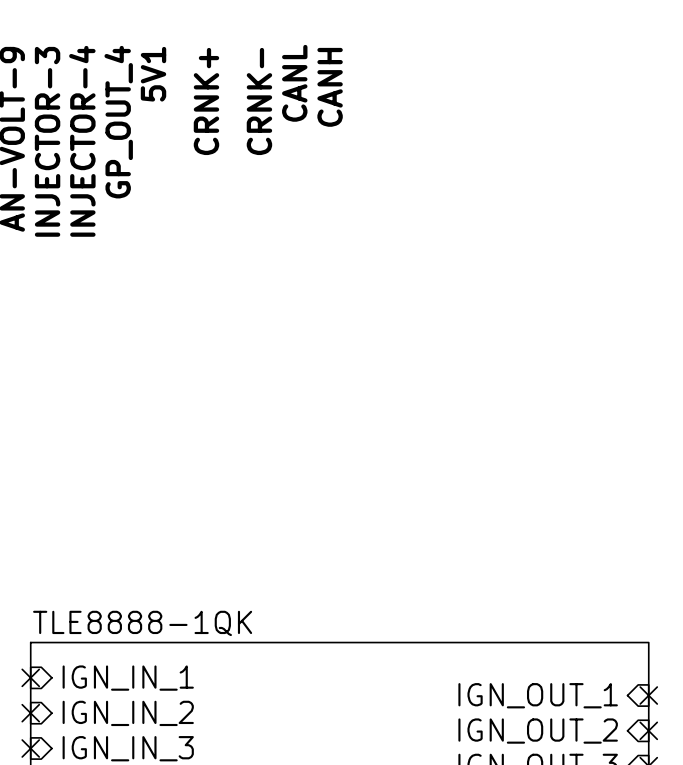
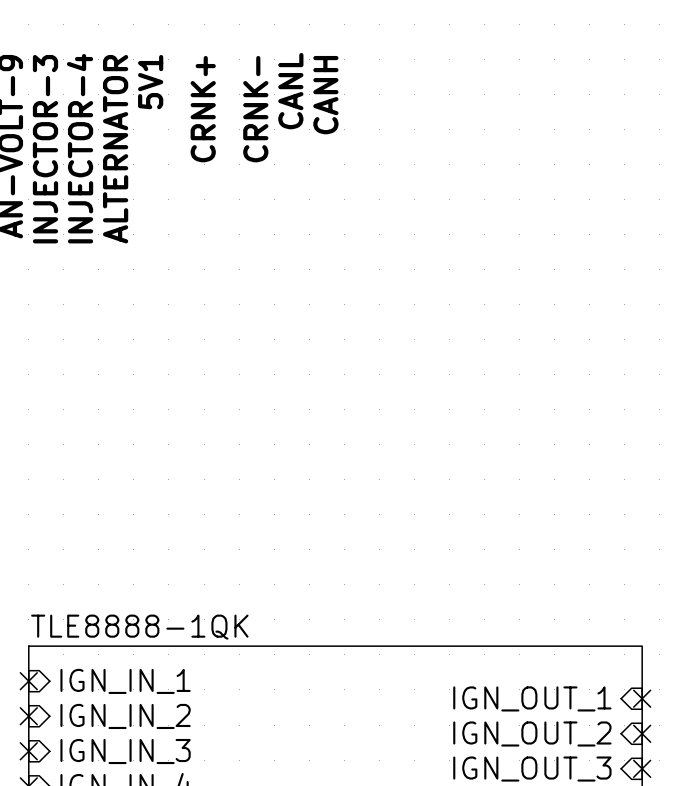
label: GP_OUT_4 (118, 122) -> ALTERNATOR (115, 149)

